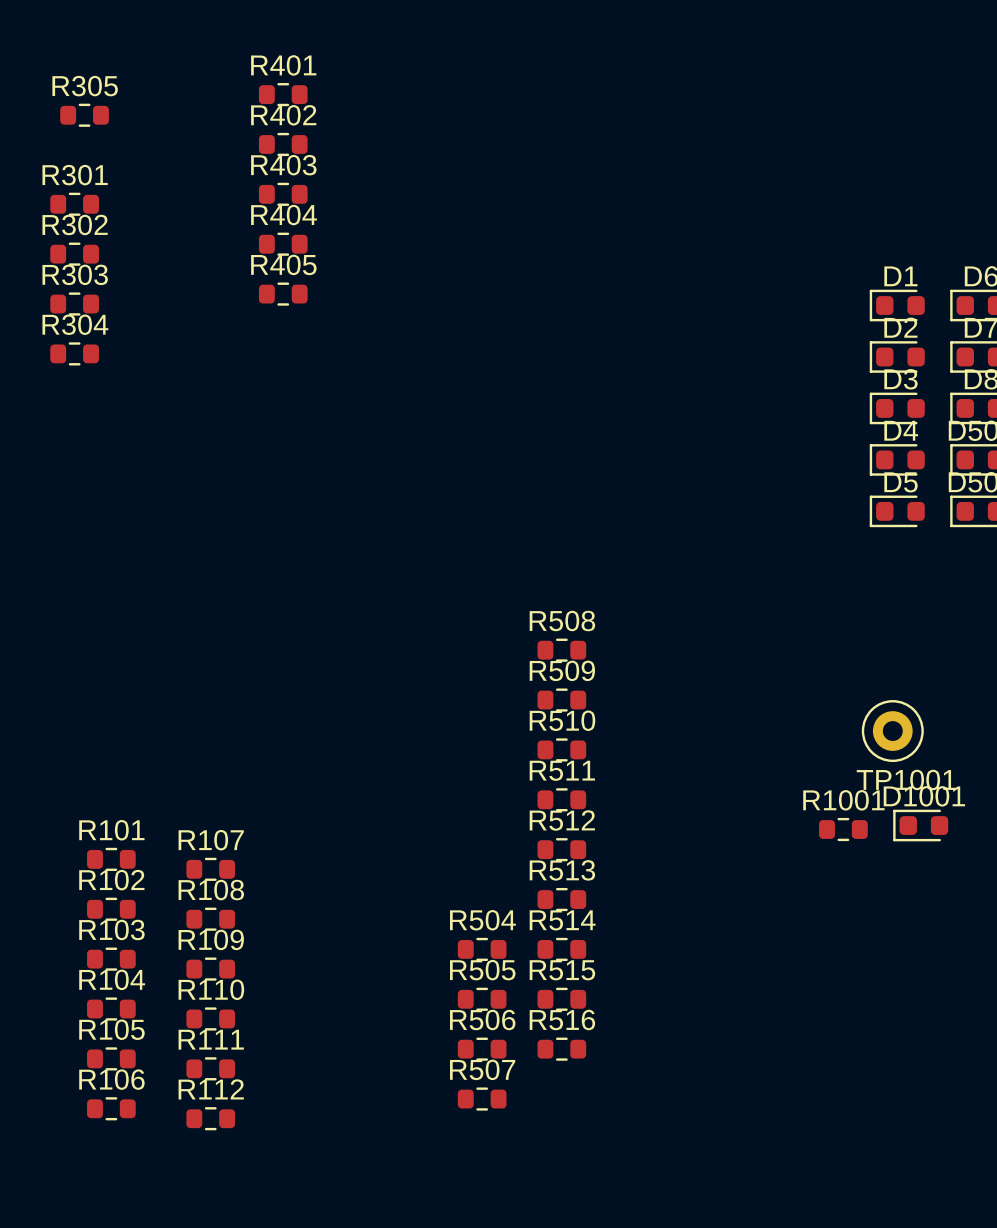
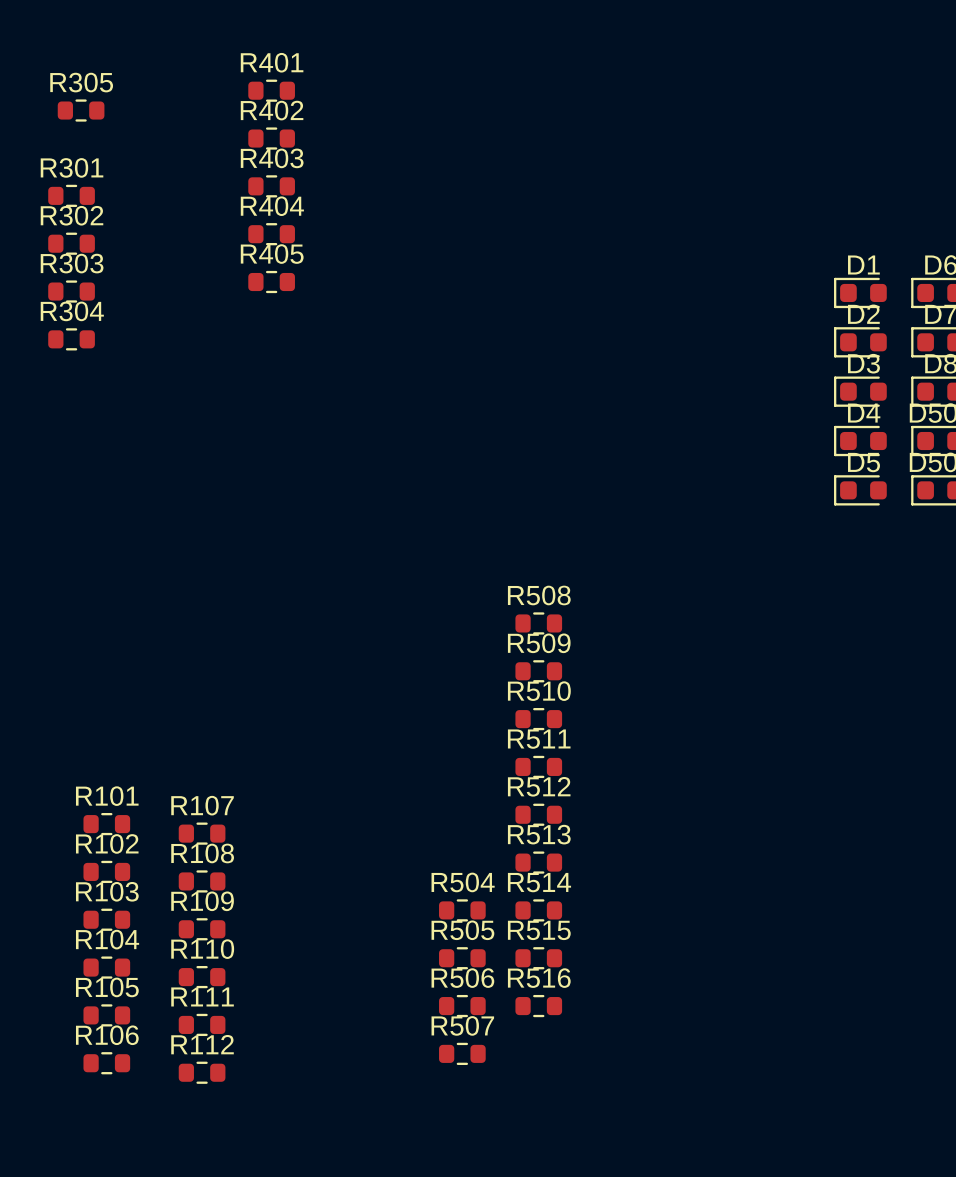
TP1001: (892, 731) -> none
D1001: (920, 825) -> none
R1001: (843, 829) -> none

